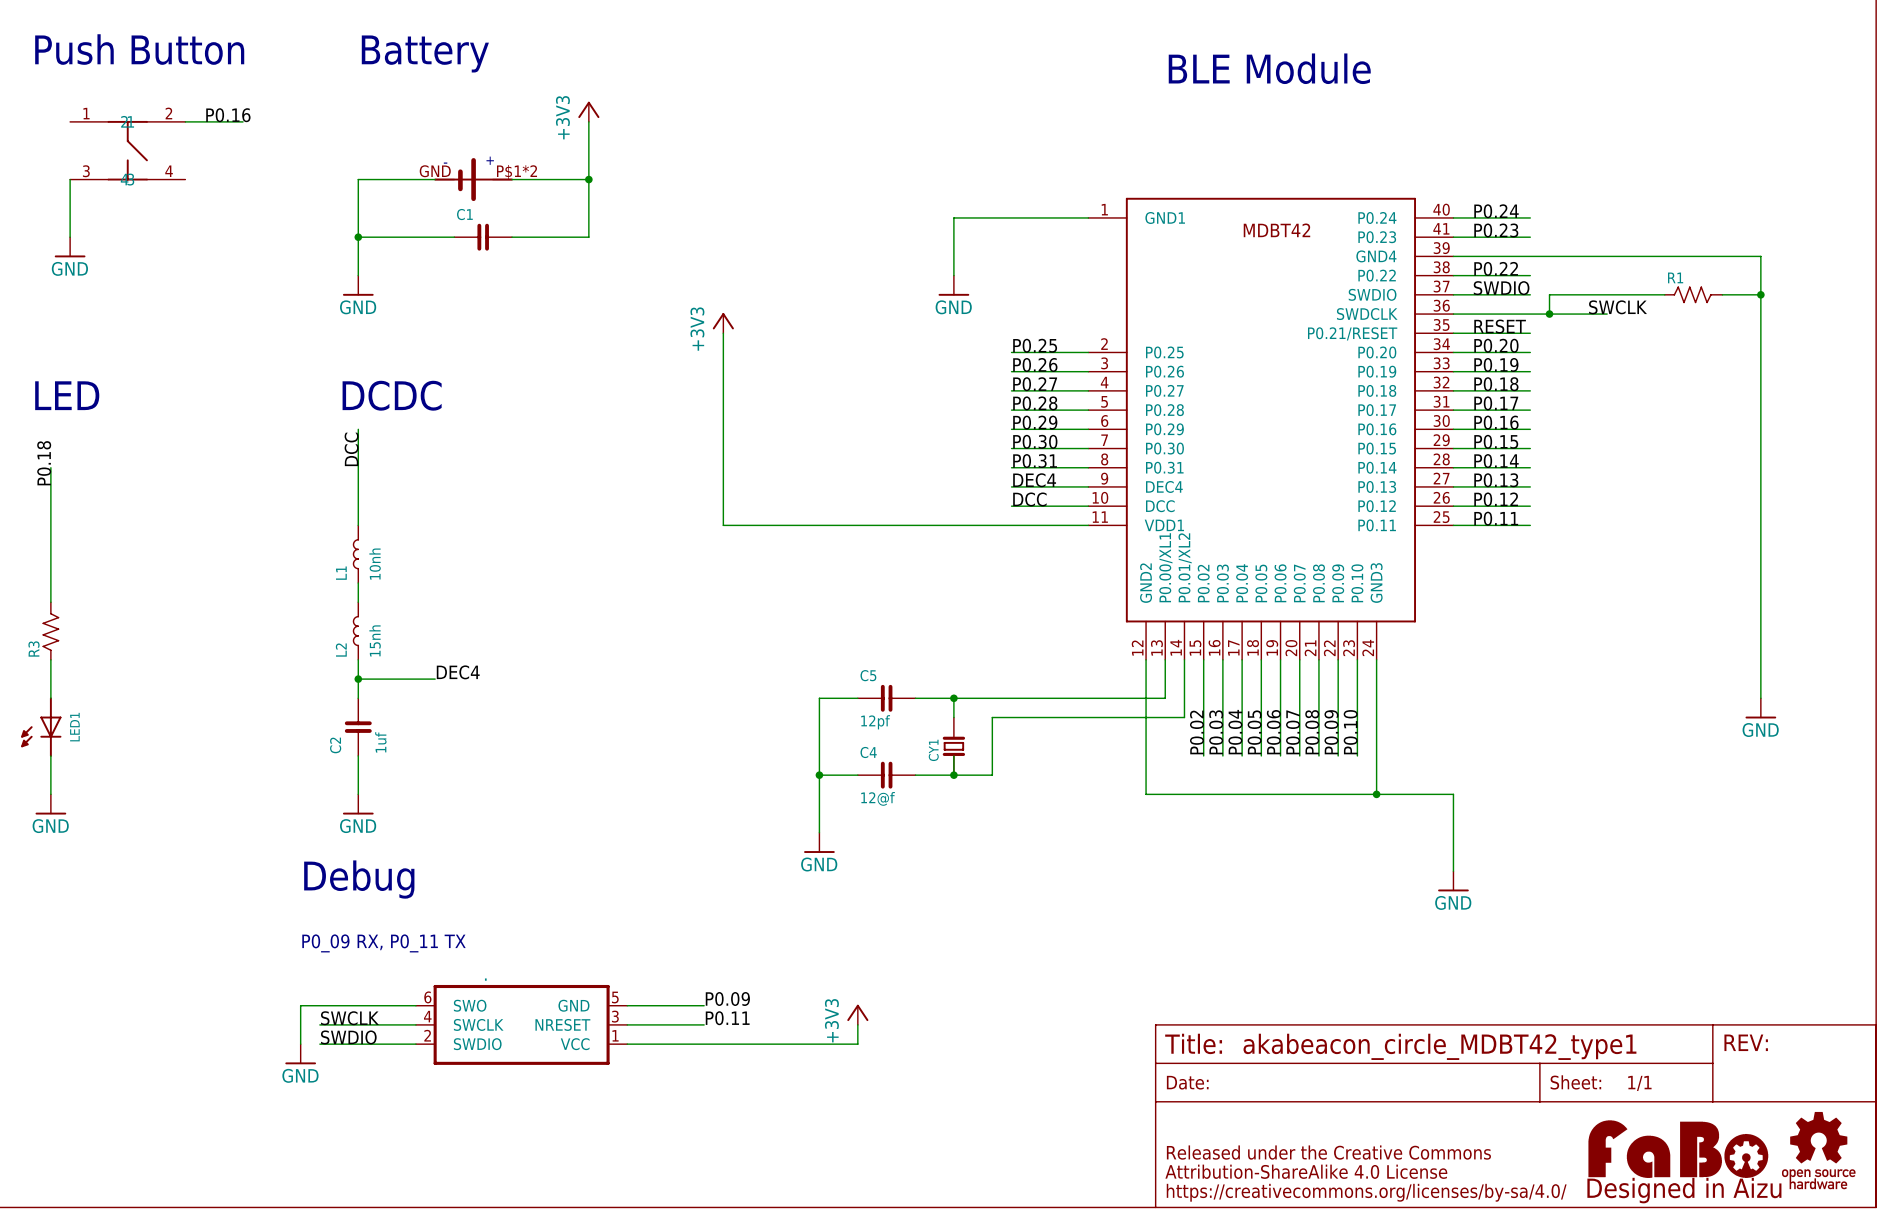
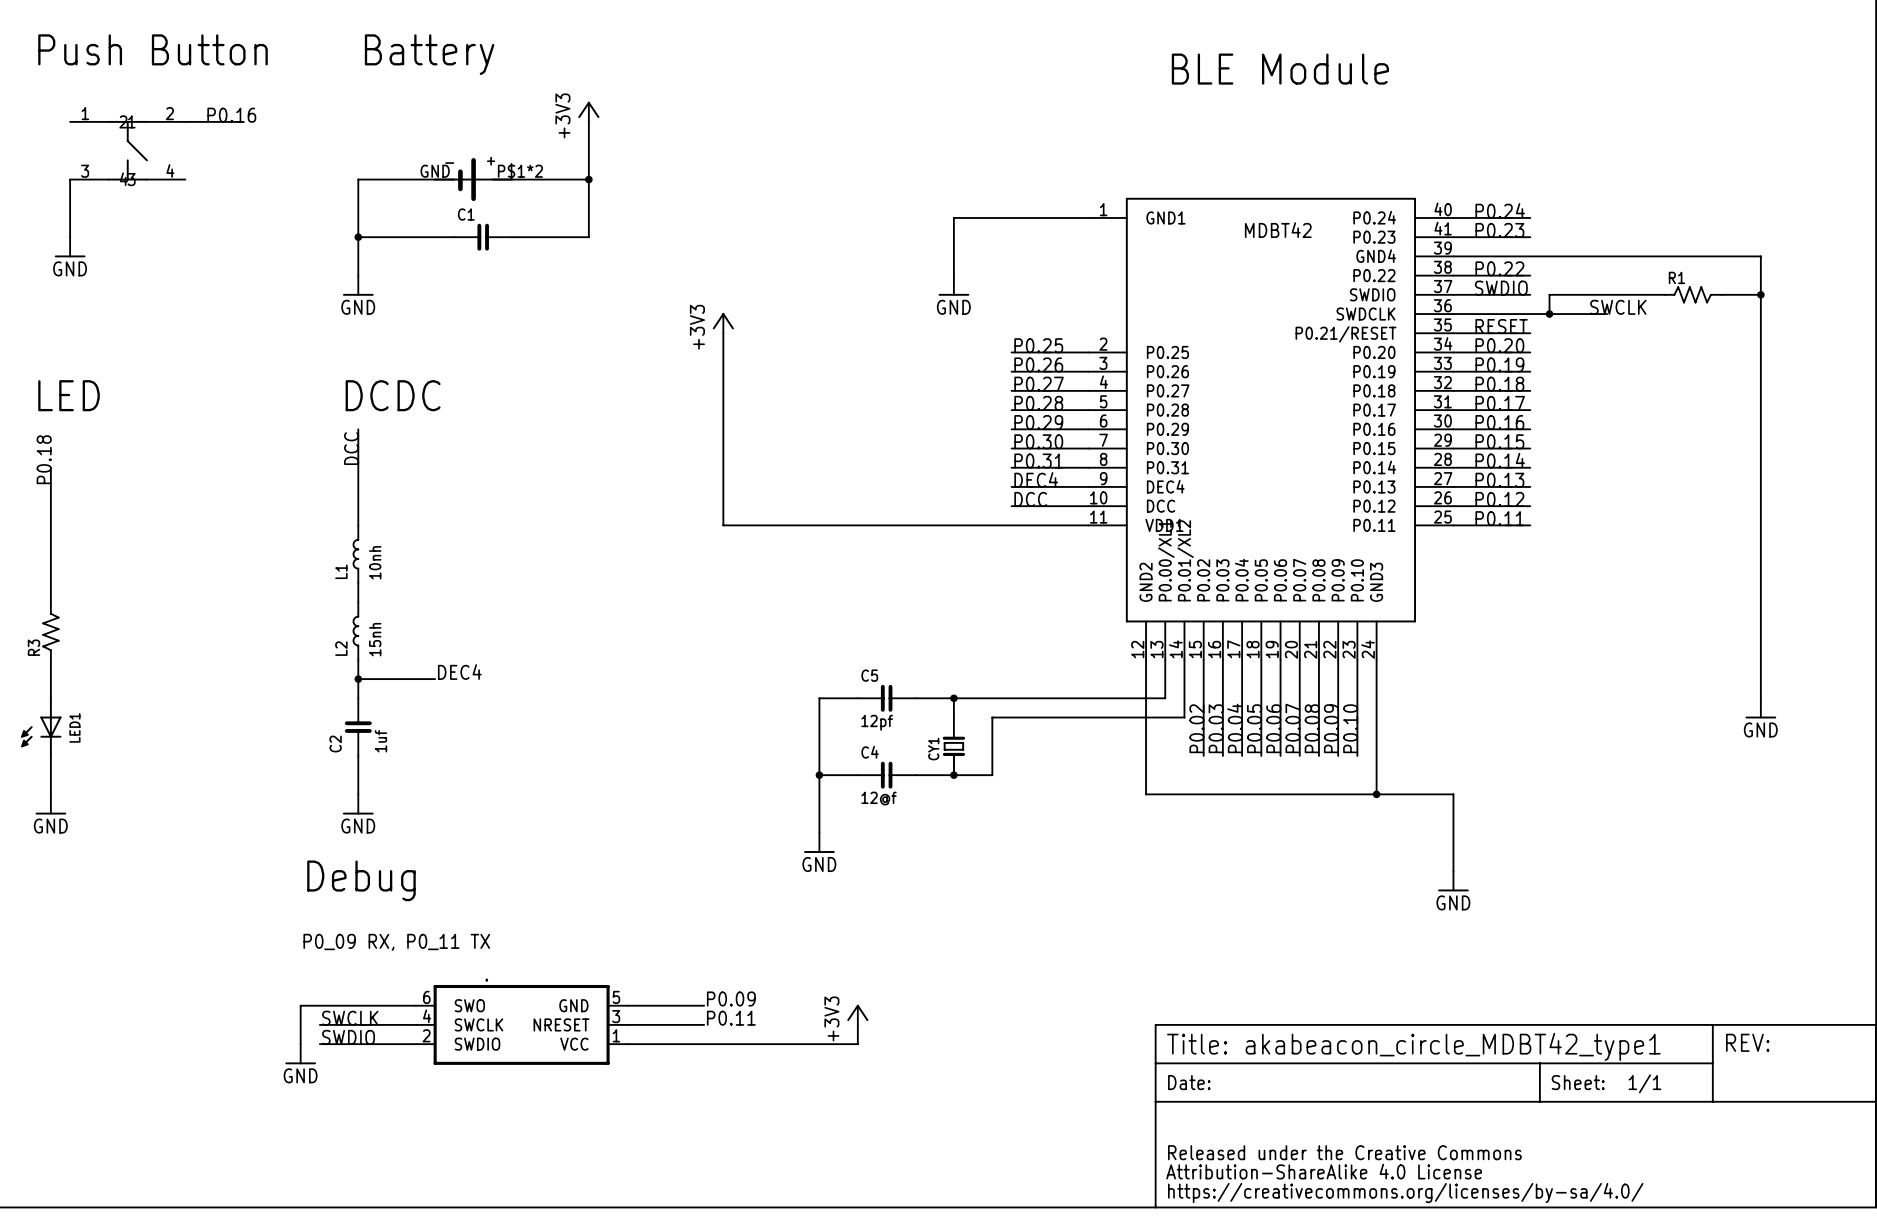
part: (1678, 1149) -> none
part: (1818, 1150) -> none

